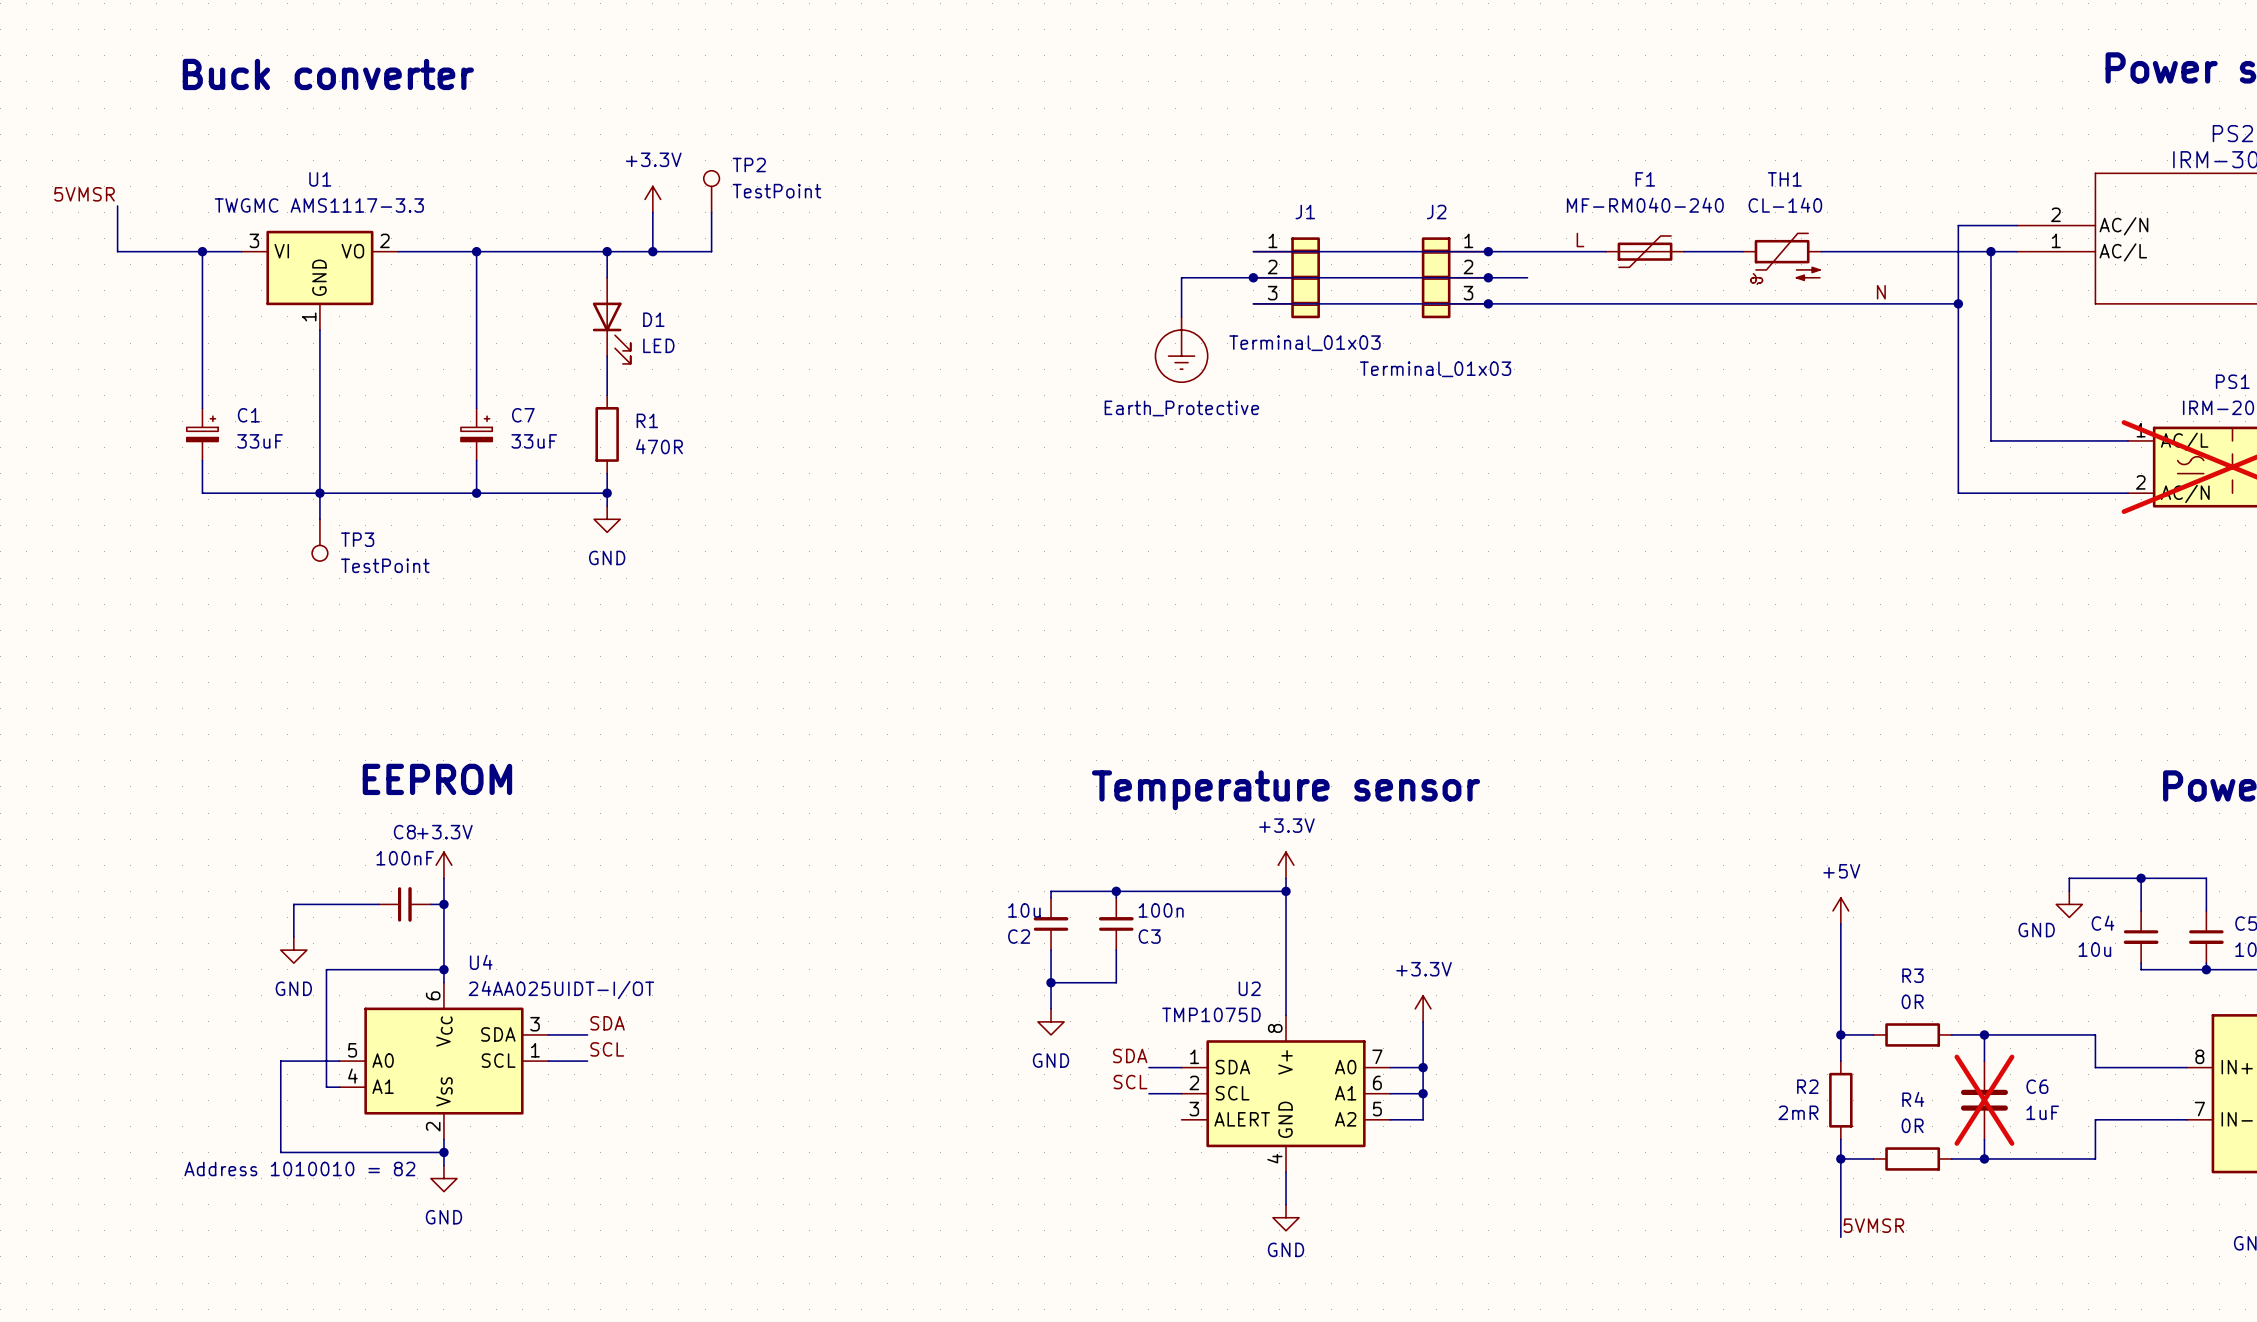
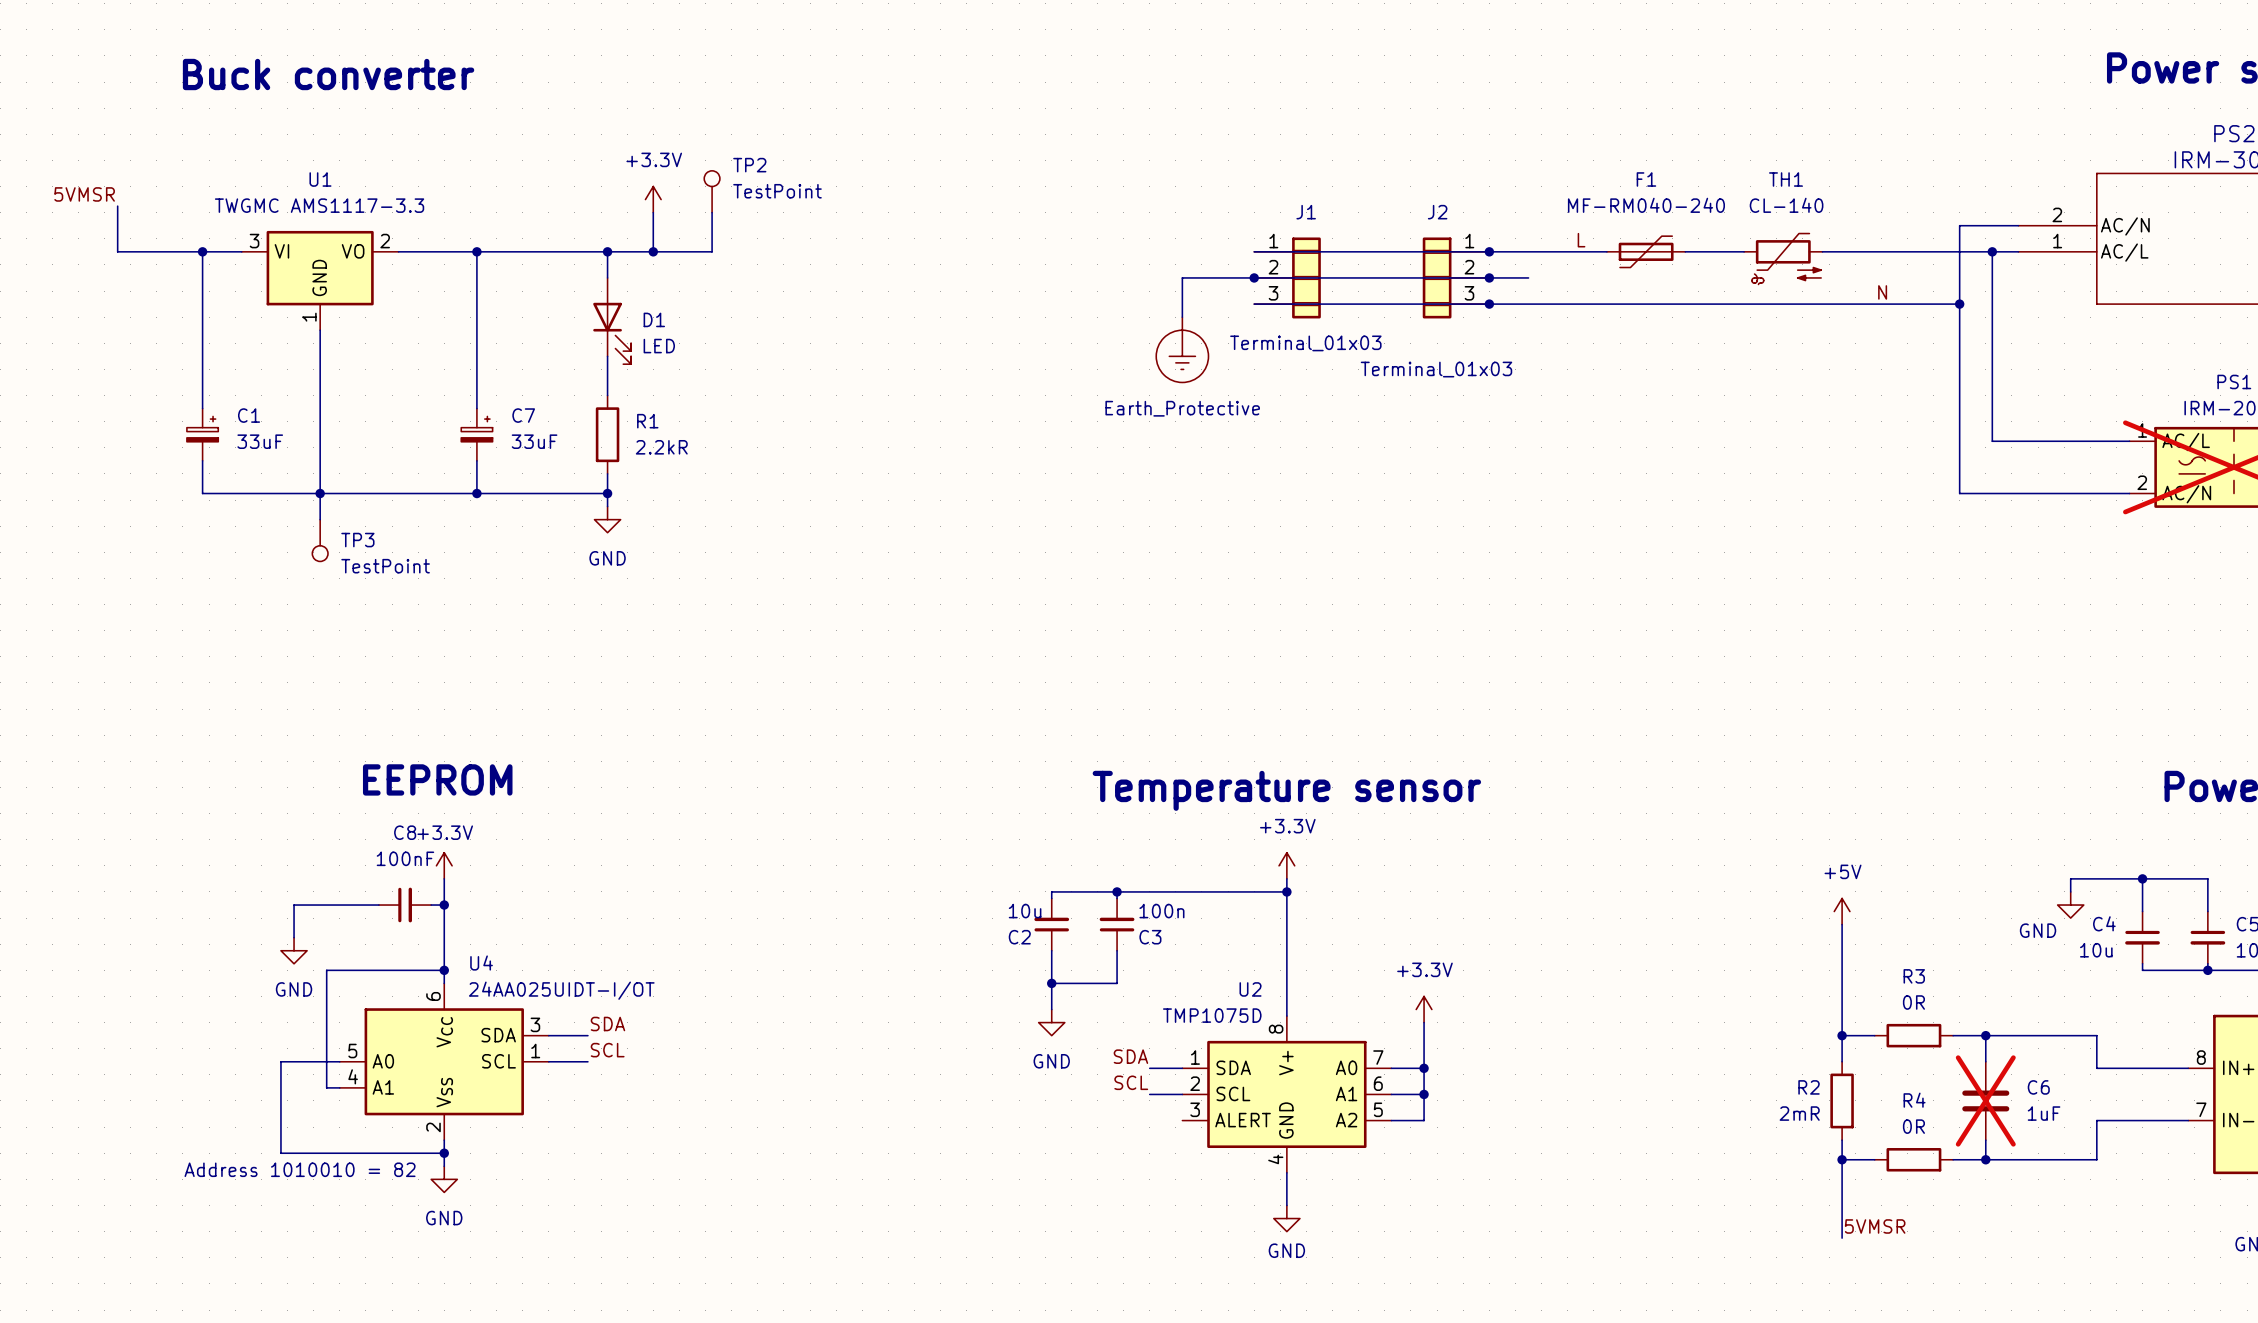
R1 value: 470R (659, 446) -> 2.2kR (661, 447)

